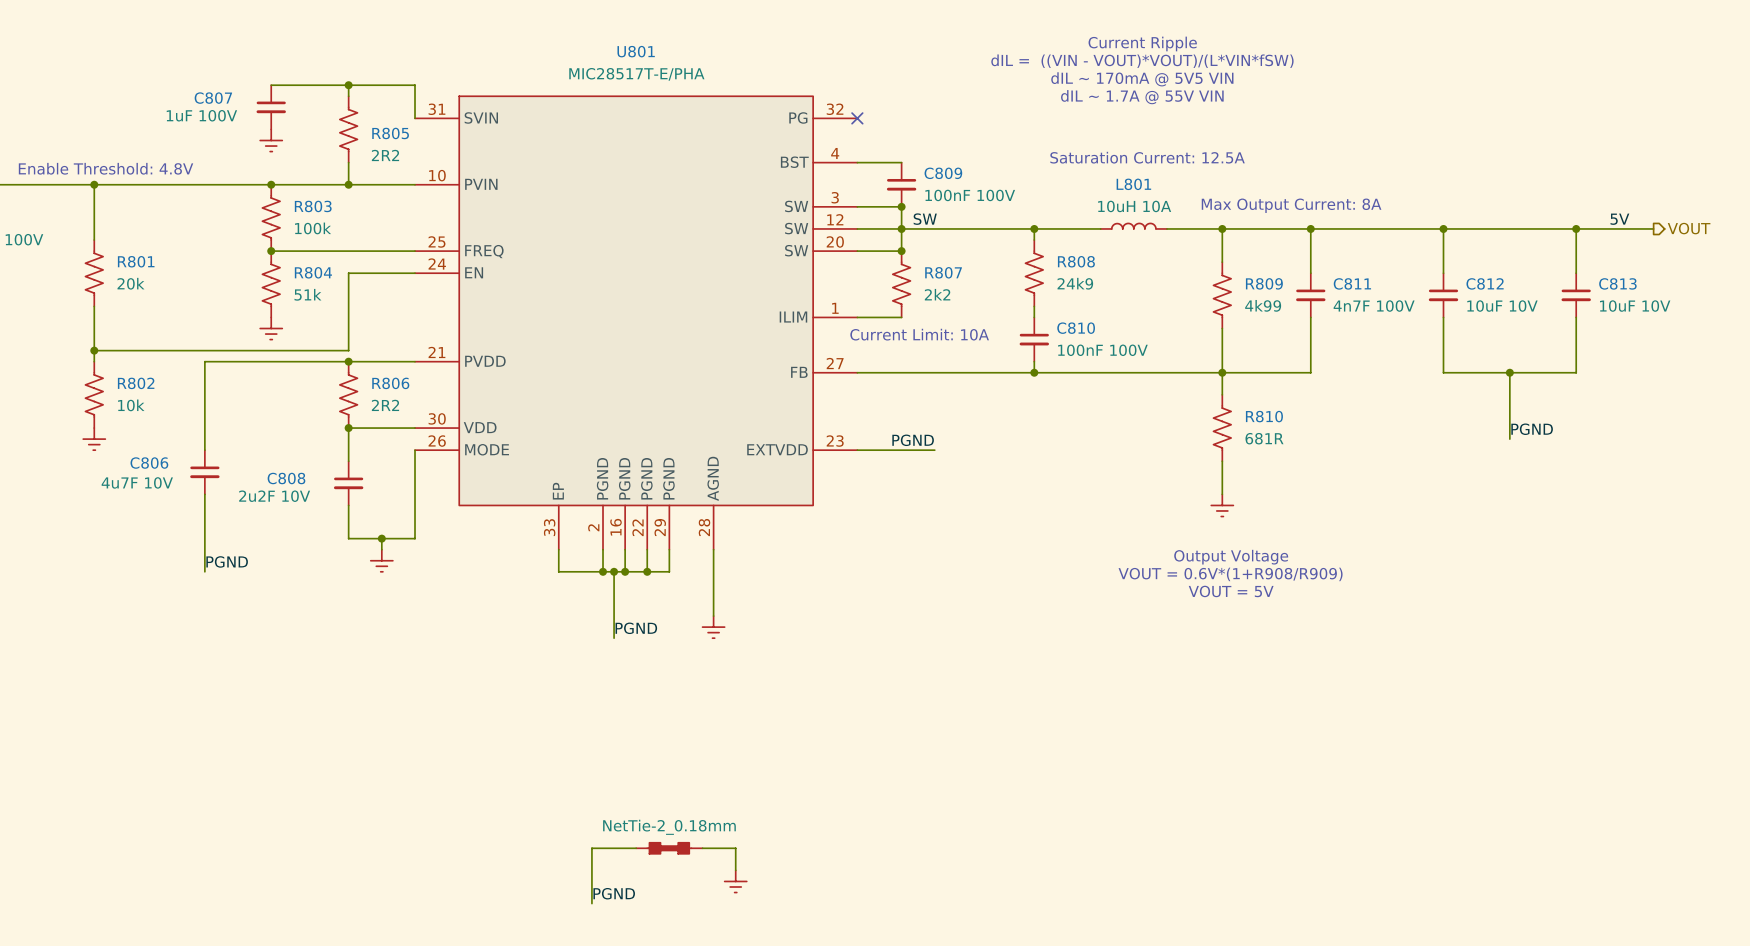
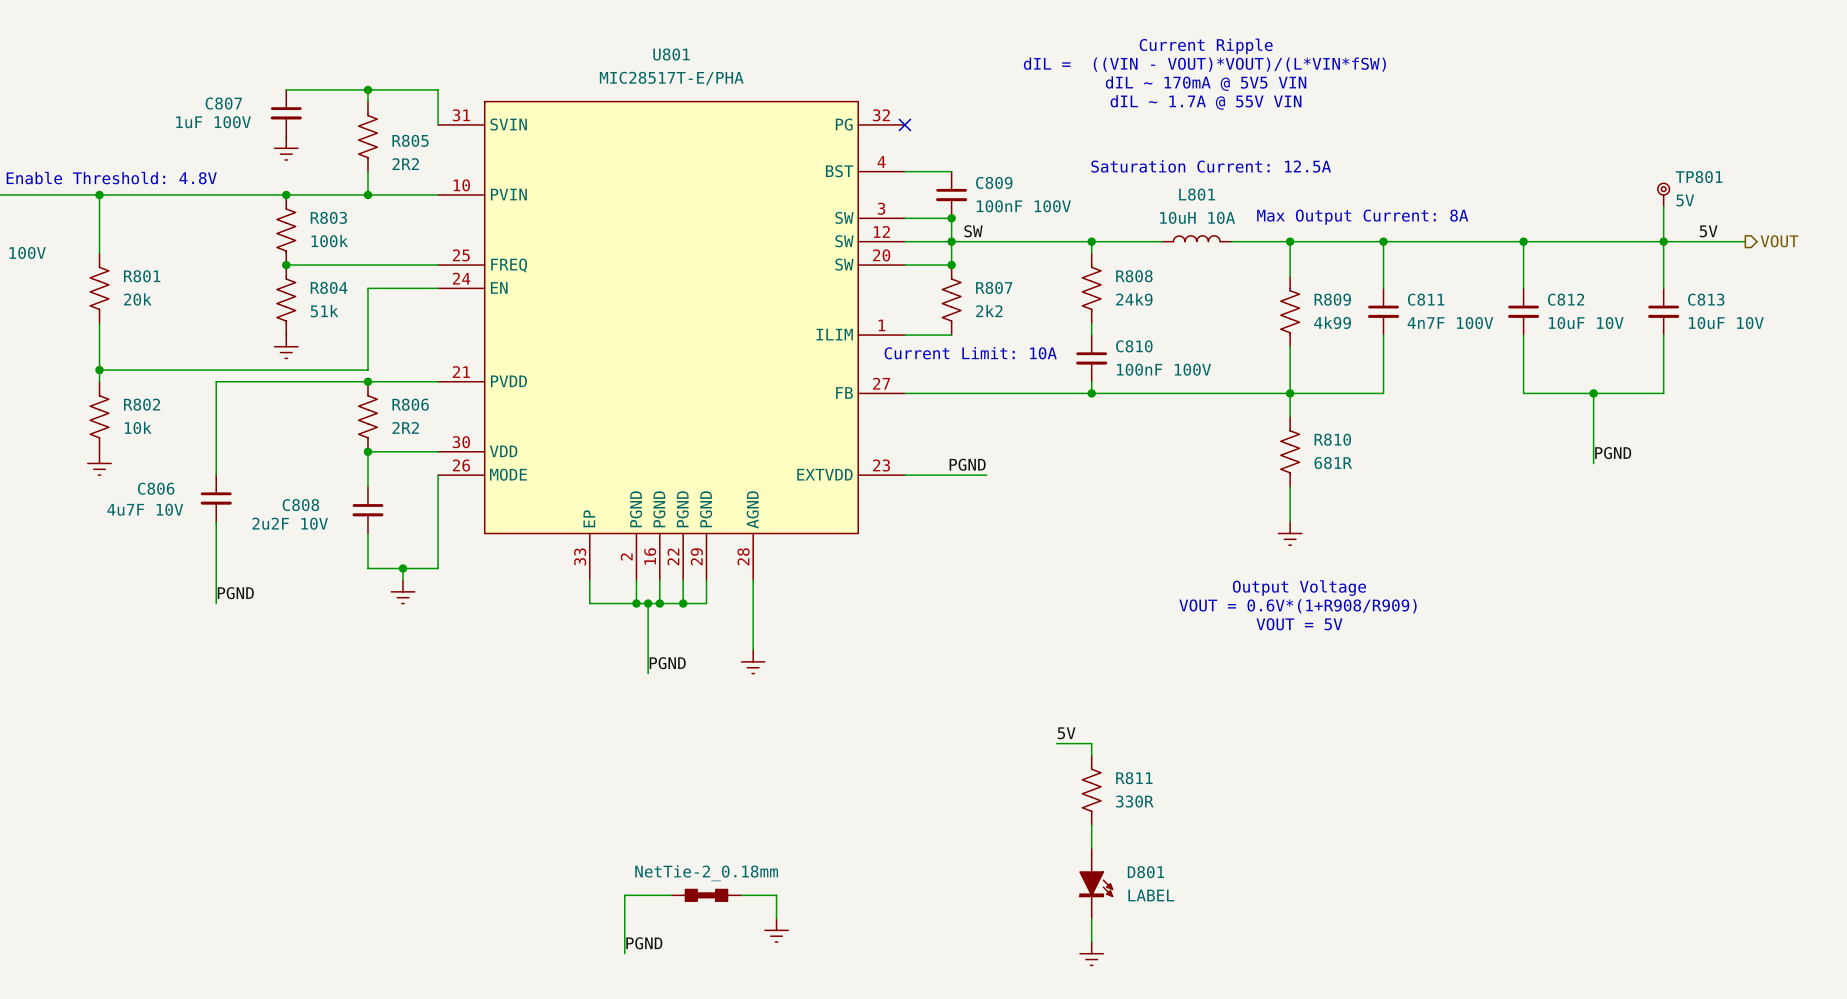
TP801: none -> 5V (1663, 194)
wire: none -> (1663, 206) (1663, 241)
label: none -> 5V (1066, 733)
wire: none -> (1056, 743) (1091, 743) (1091, 755)
R811: none -> 330R (1091, 790)
wire: none -> (1091, 825) (1091, 848)
D801: none -> LABEL (1096, 883)
wire: none -> (1091, 918) (1091, 942)
power symbol: none -> (1091, 953)

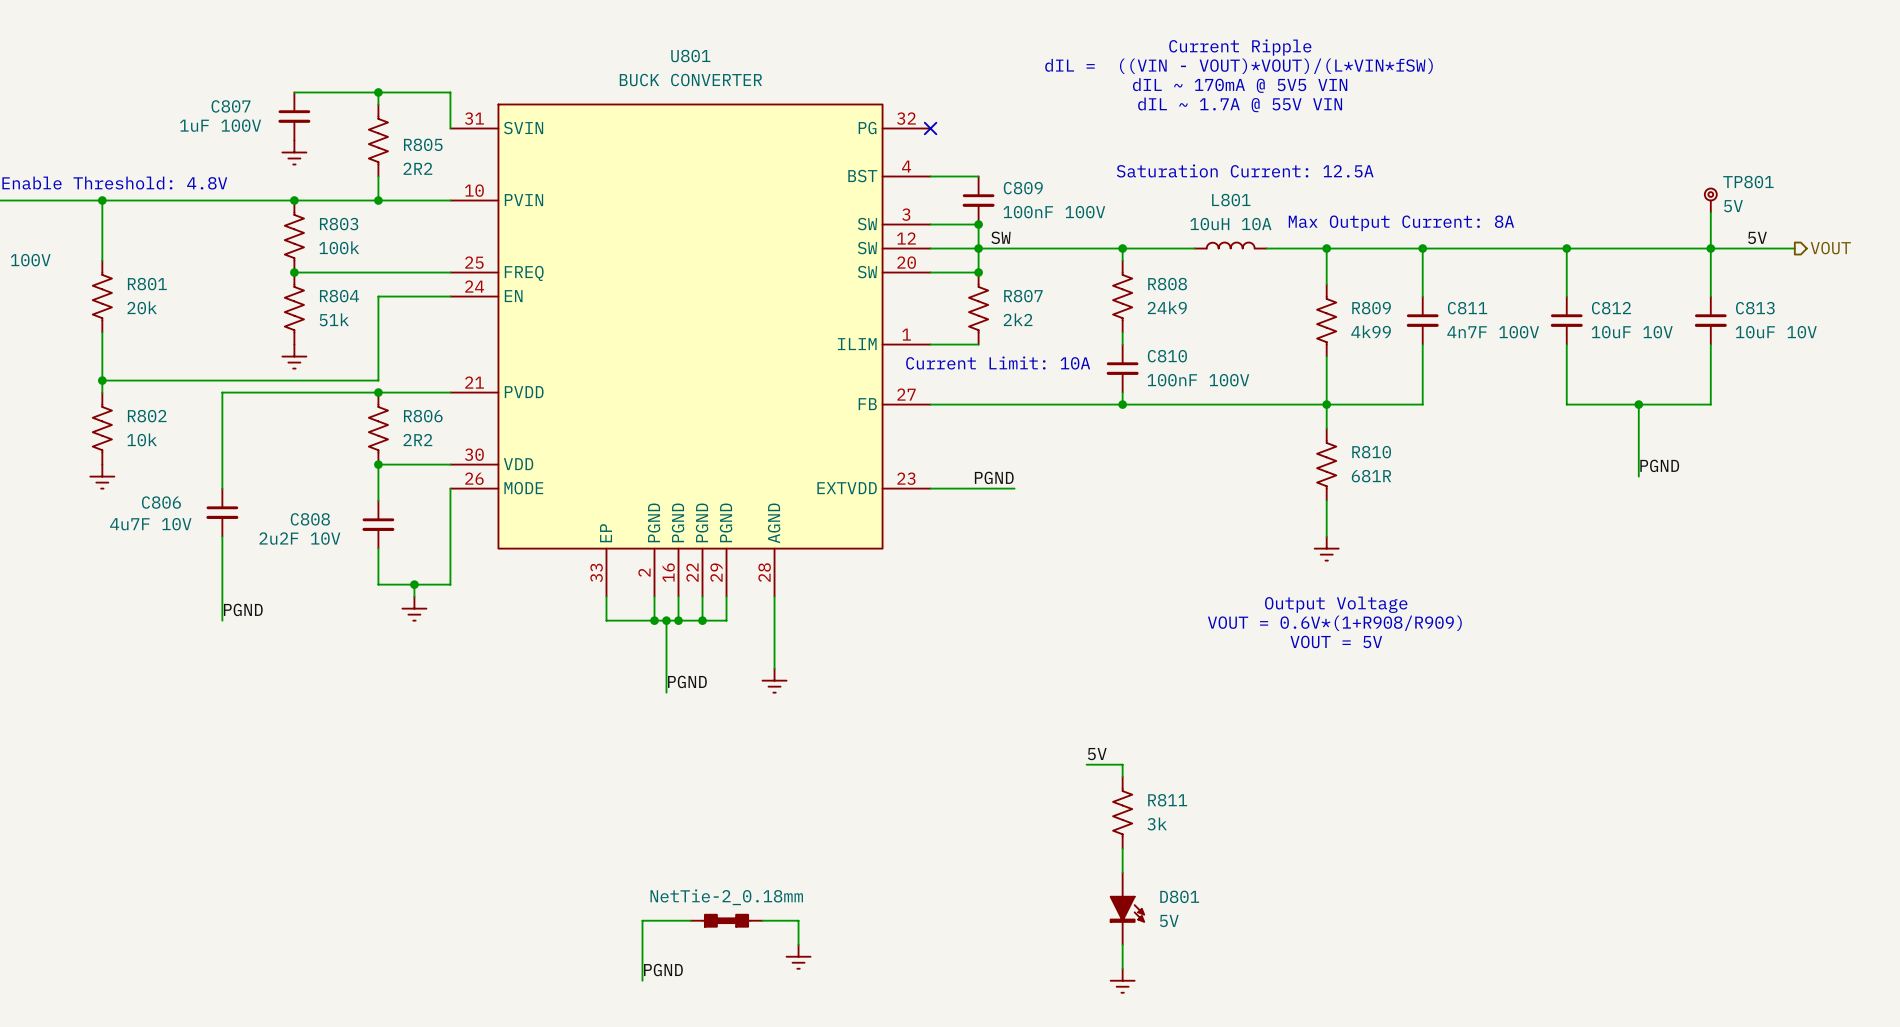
U801 value: MIC28517T-E/PHA (671, 78) -> BUCK CONVERTER (690, 80)
R811 value: 330R (1134, 801) -> 3k (1157, 823)
D801 value: LABEL (1151, 895) -> 5V (1169, 920)

